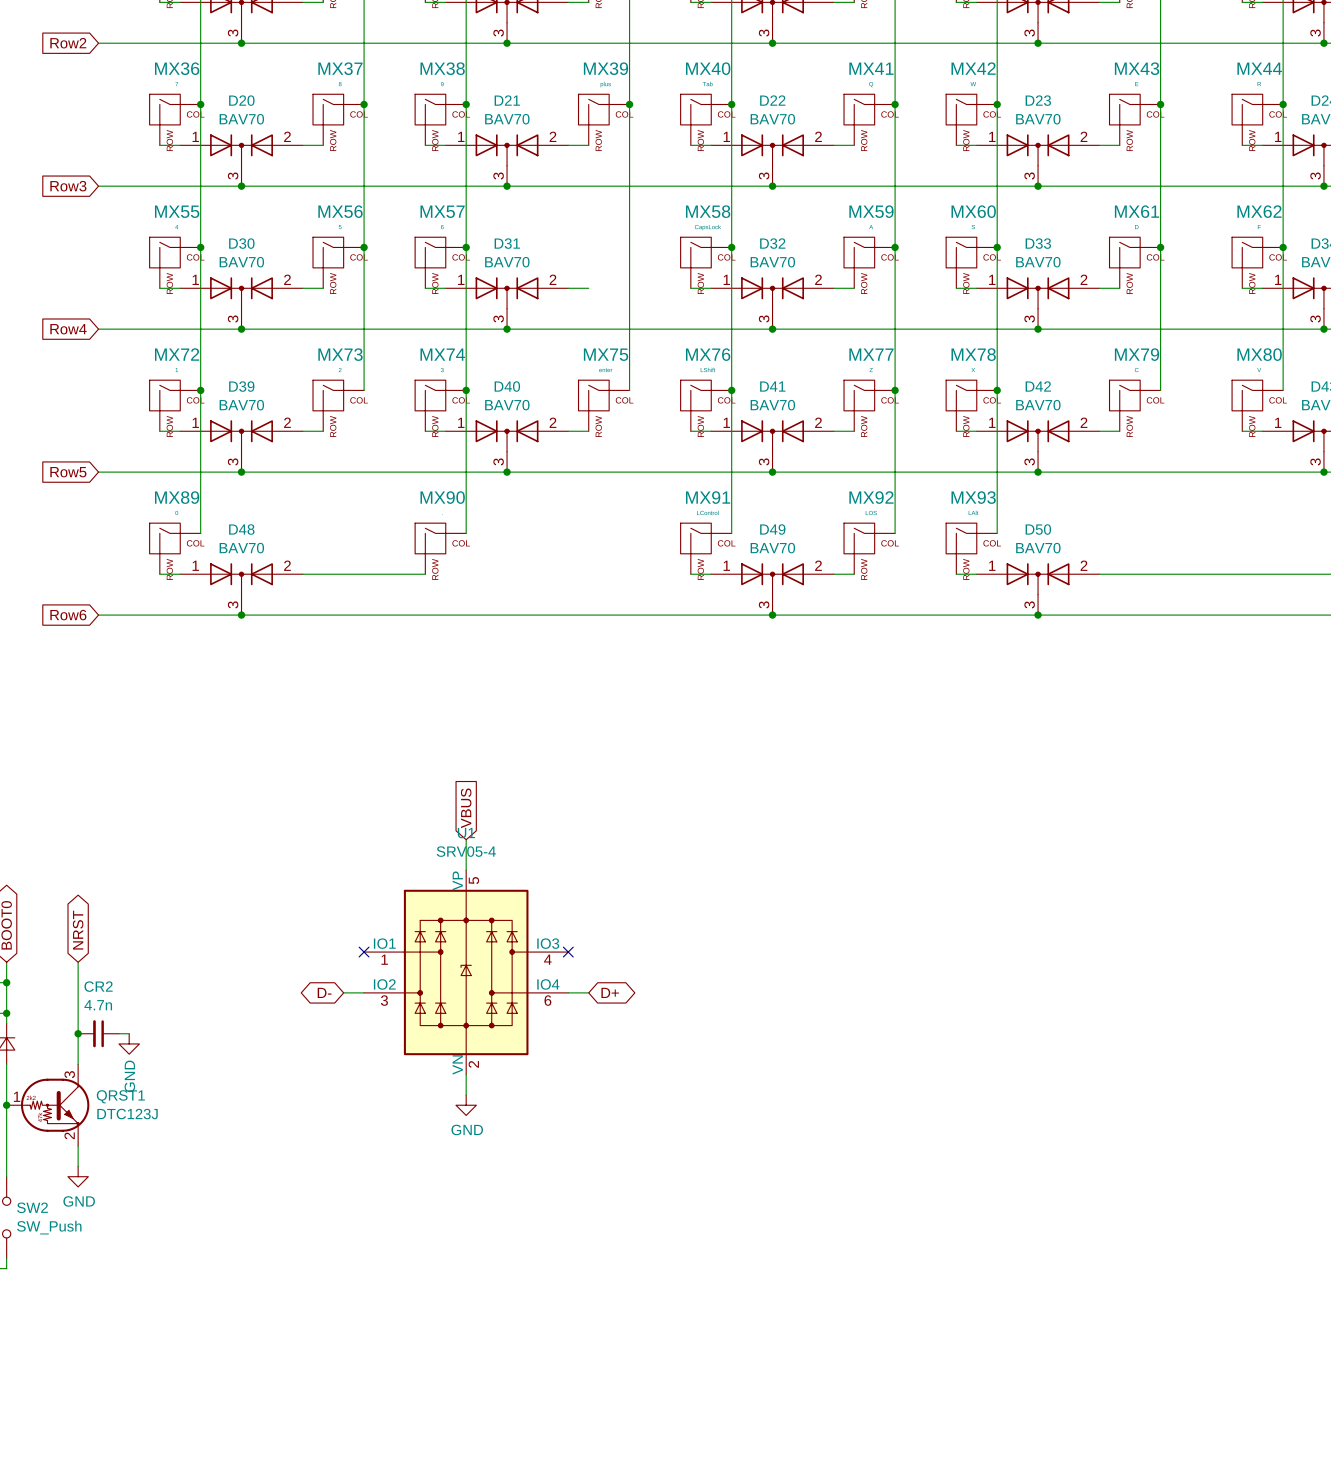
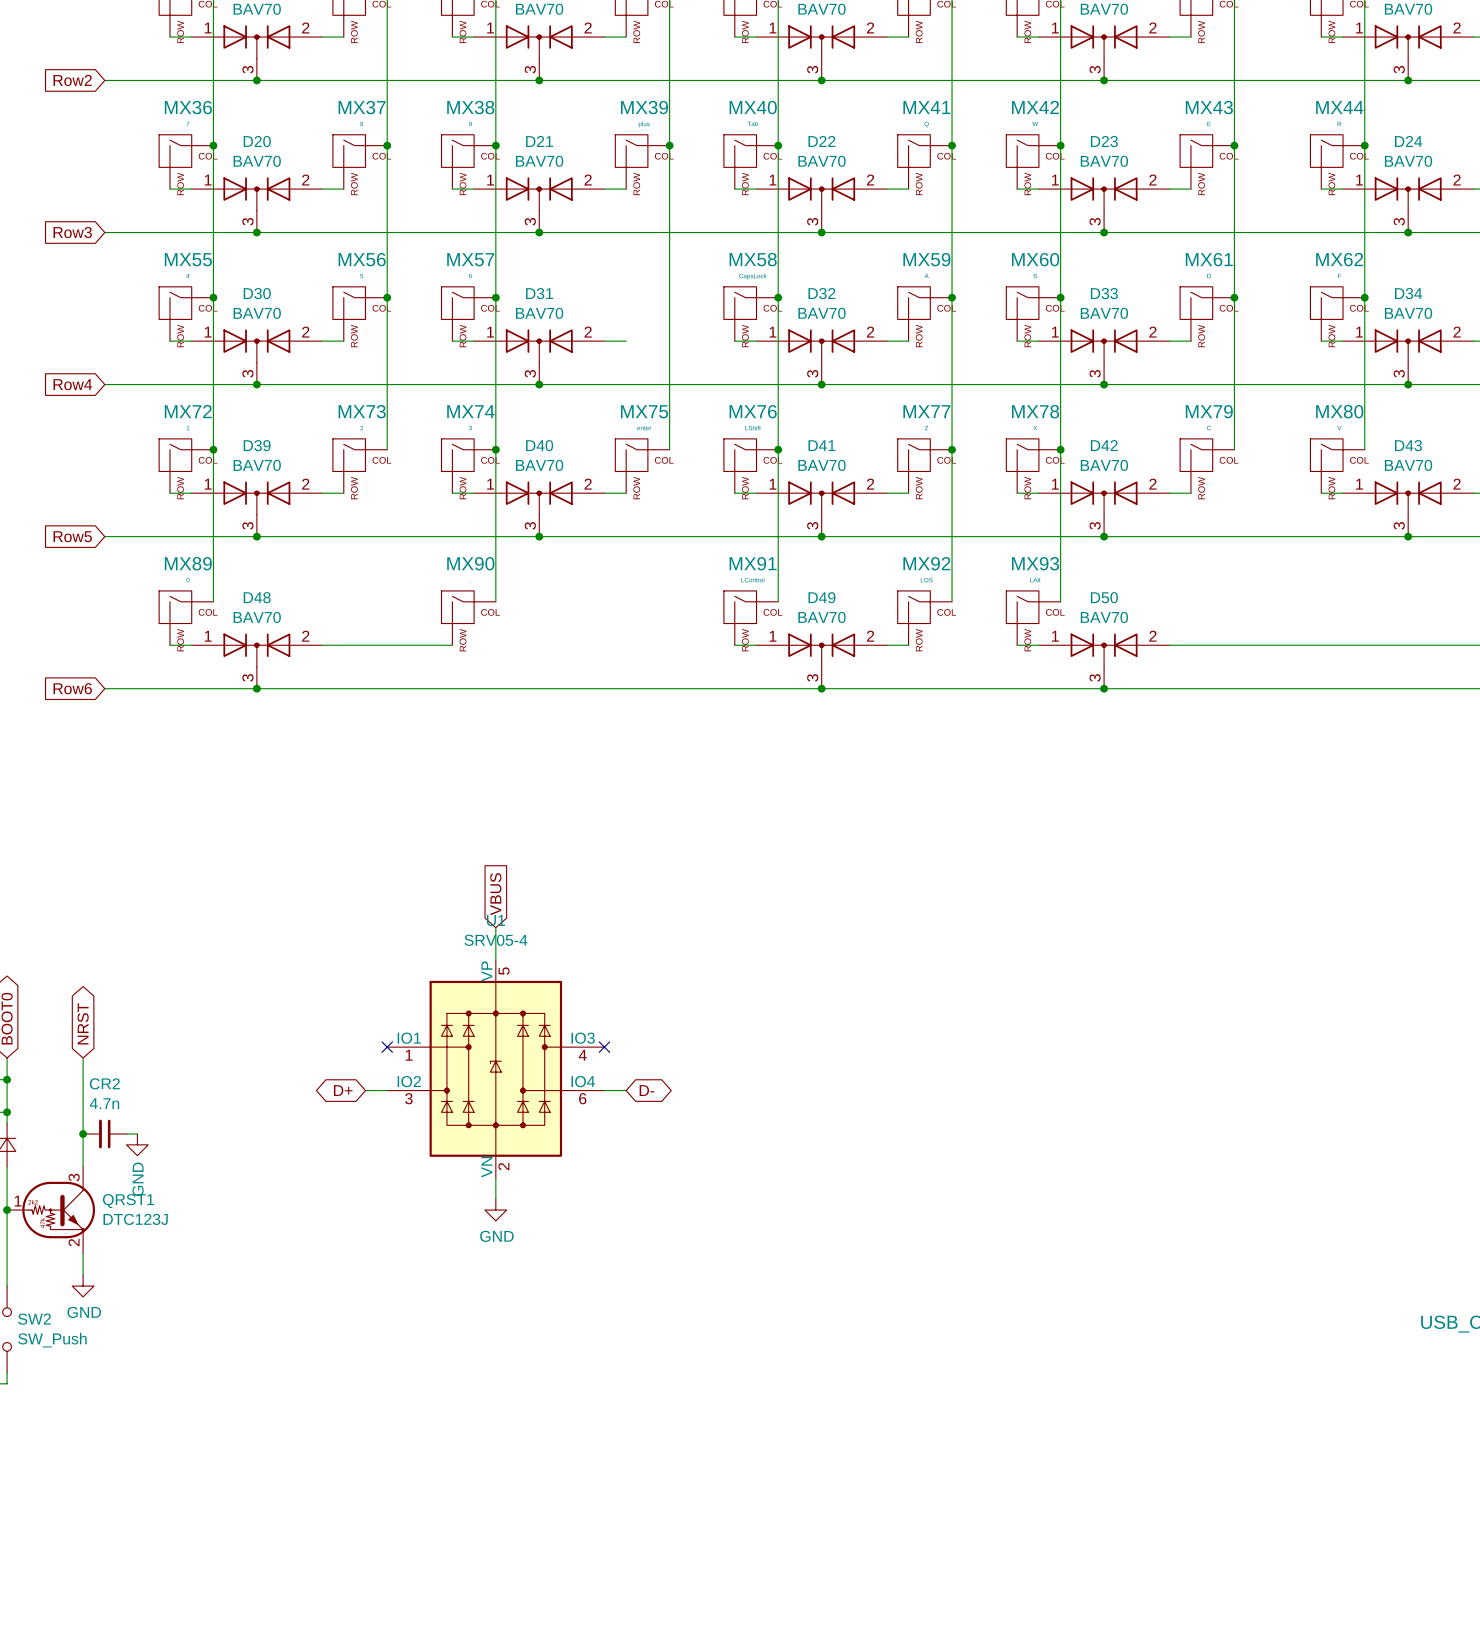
global label: D- (324, 992) -> D+ (343, 1090)
global label: D+ (610, 992) -> D- (647, 1090)

